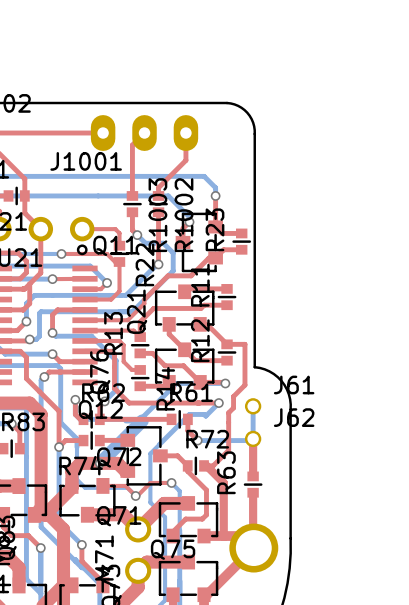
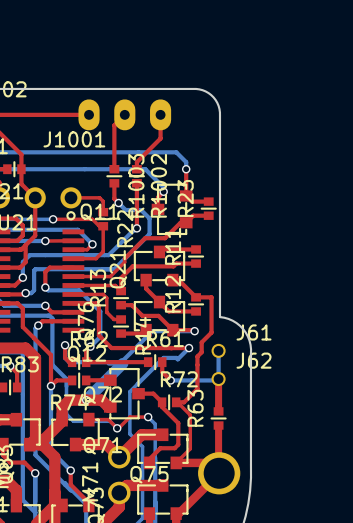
top track: (204, 465) (206, 465) (223, 482) (223, 536) -> none
top track: none -> (177, 402) (190, 415) (190, 448) (176, 462)

